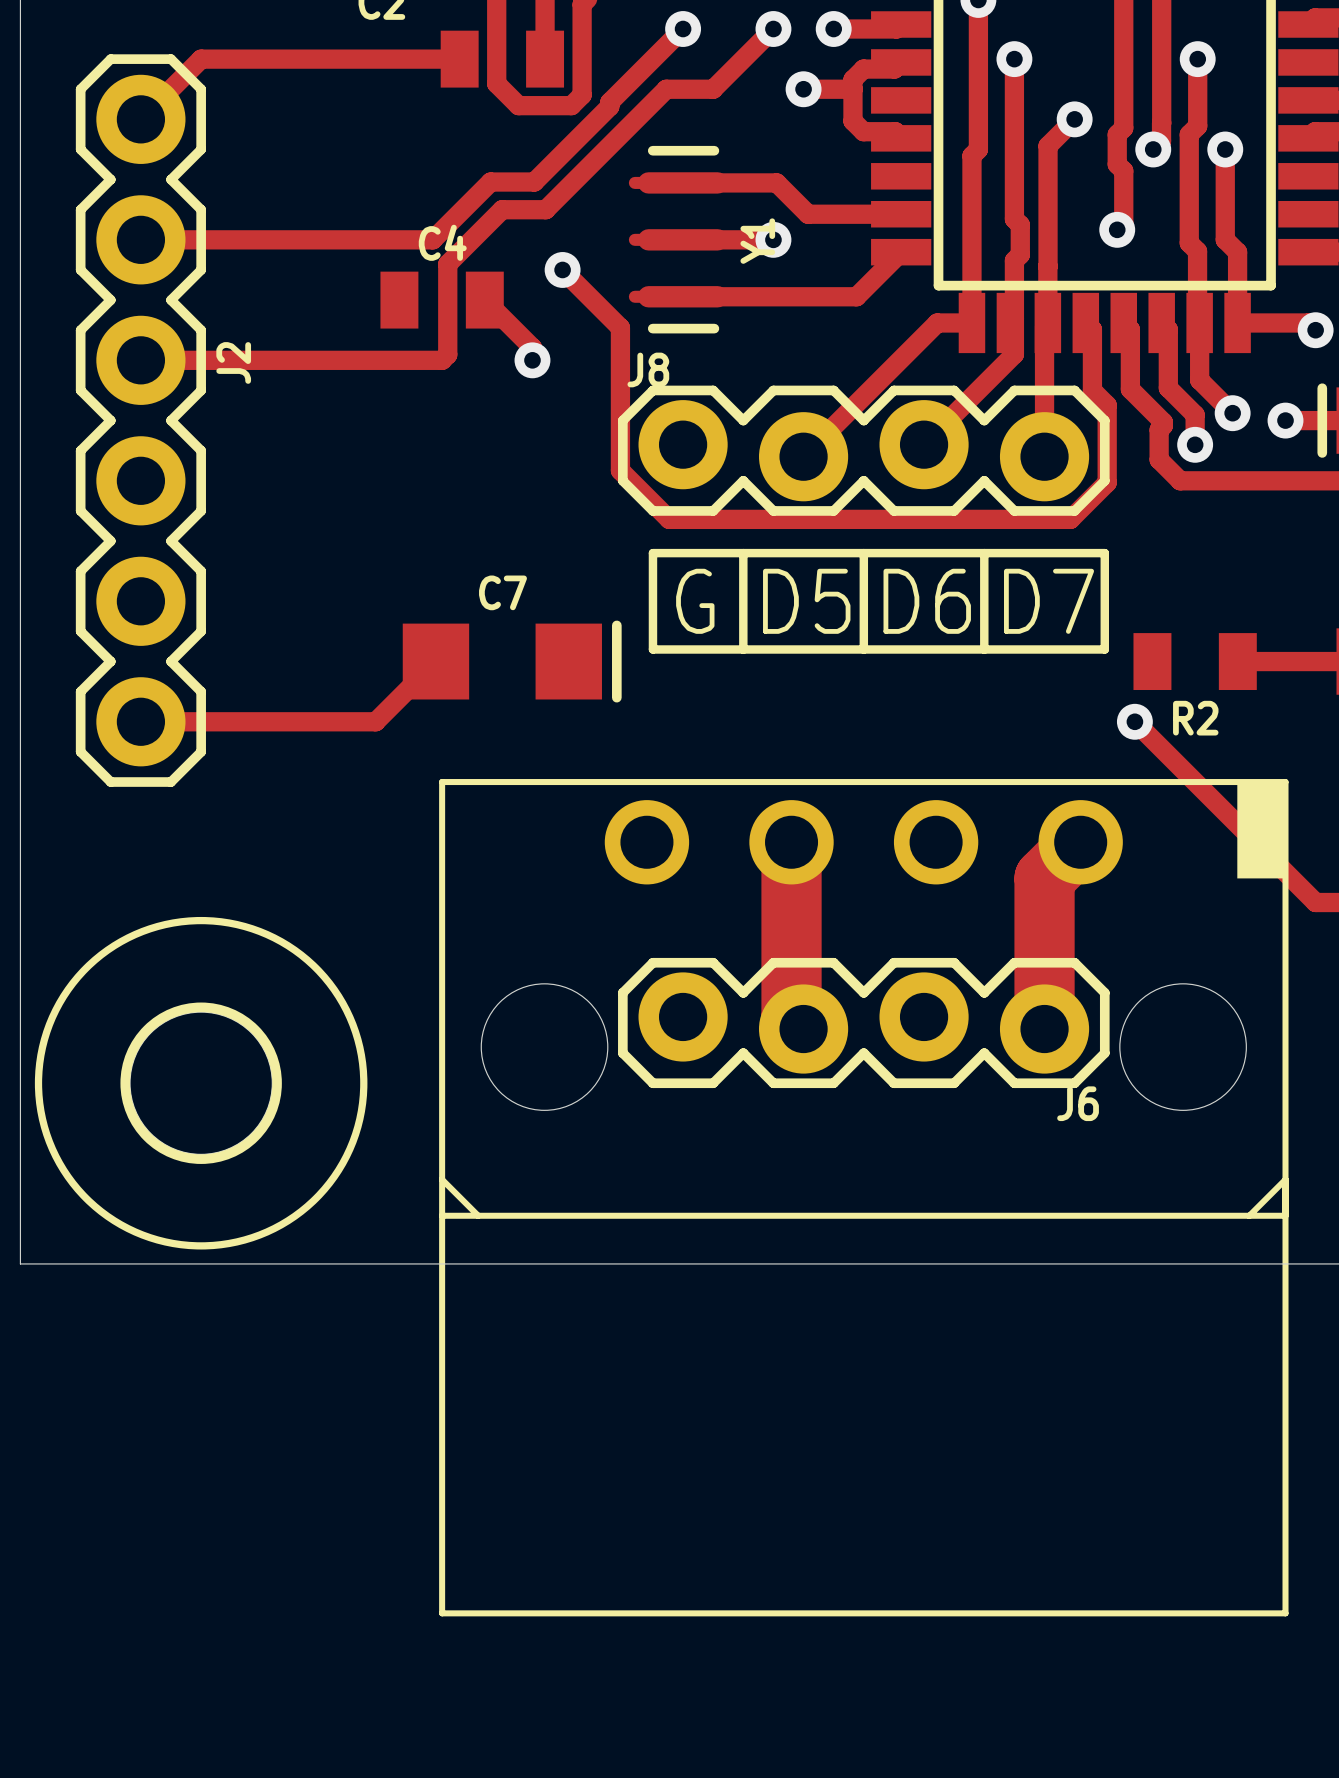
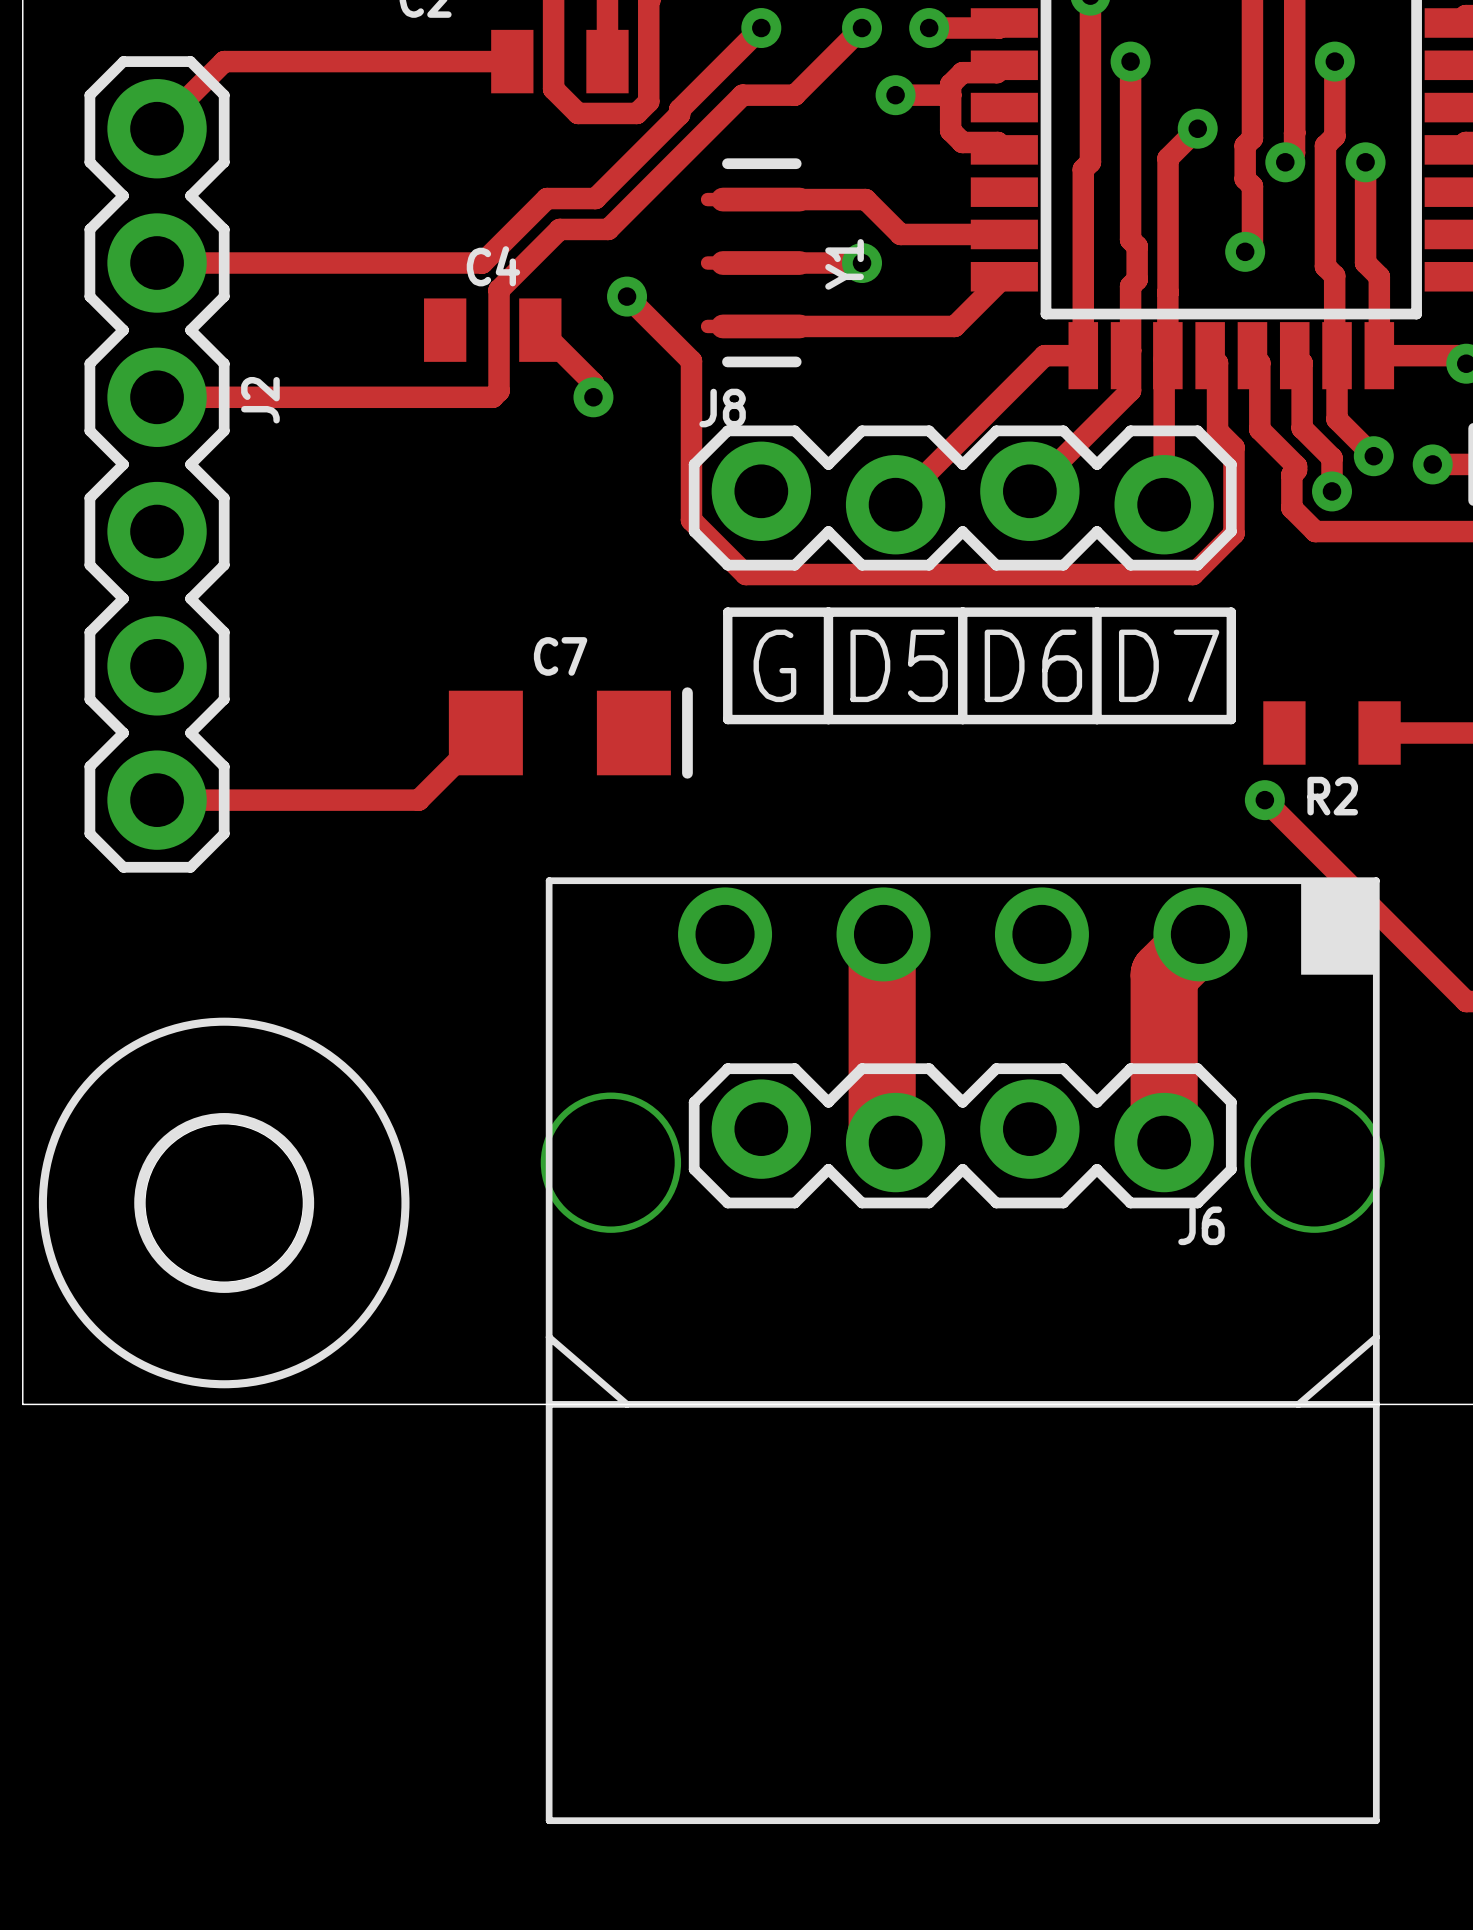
part footprint: [439, 779, 1289, 1617] -> [540, 877, 1385, 1825]

